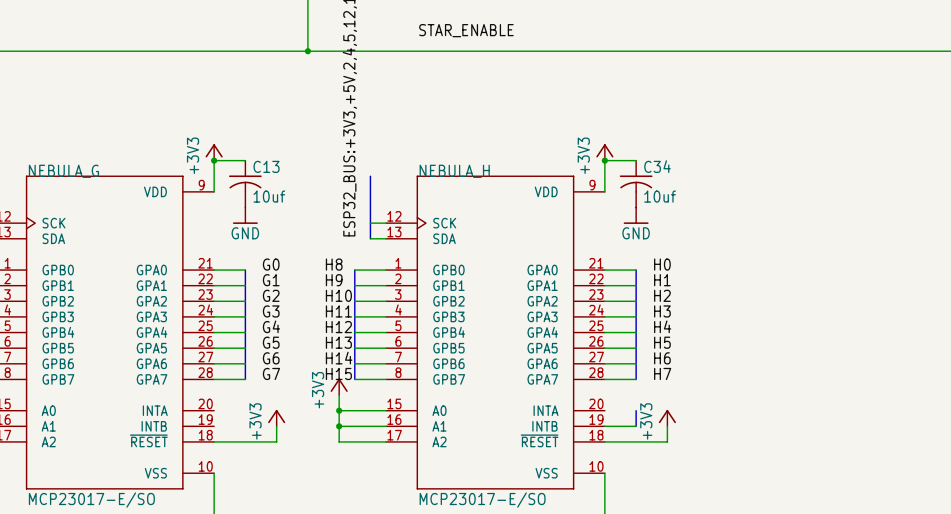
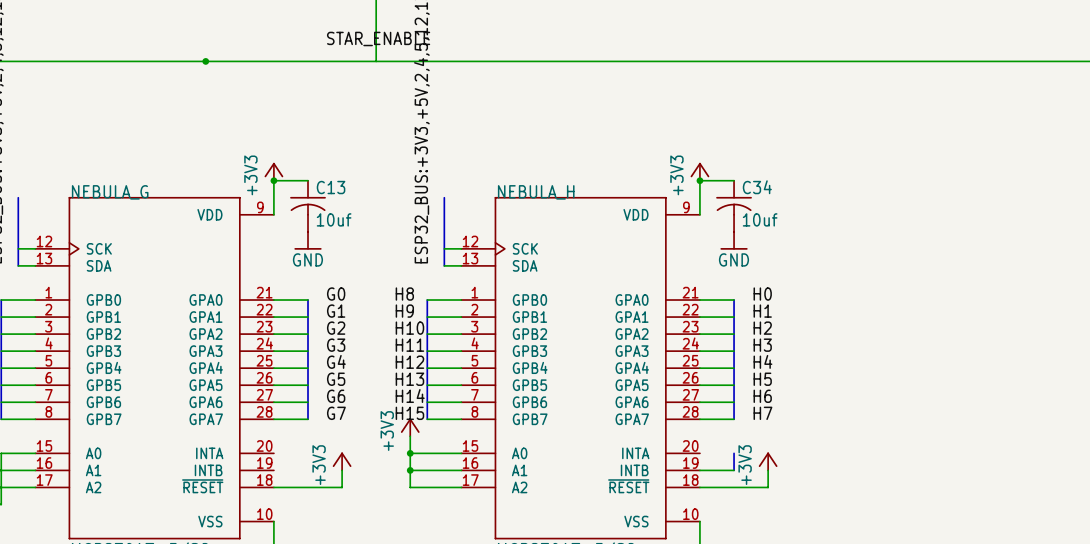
label: none -> STAR_ENABLE (378, 38)
label: STAR_ENABLE (466, 30) -> none
junction: none -> (205, 61)
junction: (307, 51) -> none

